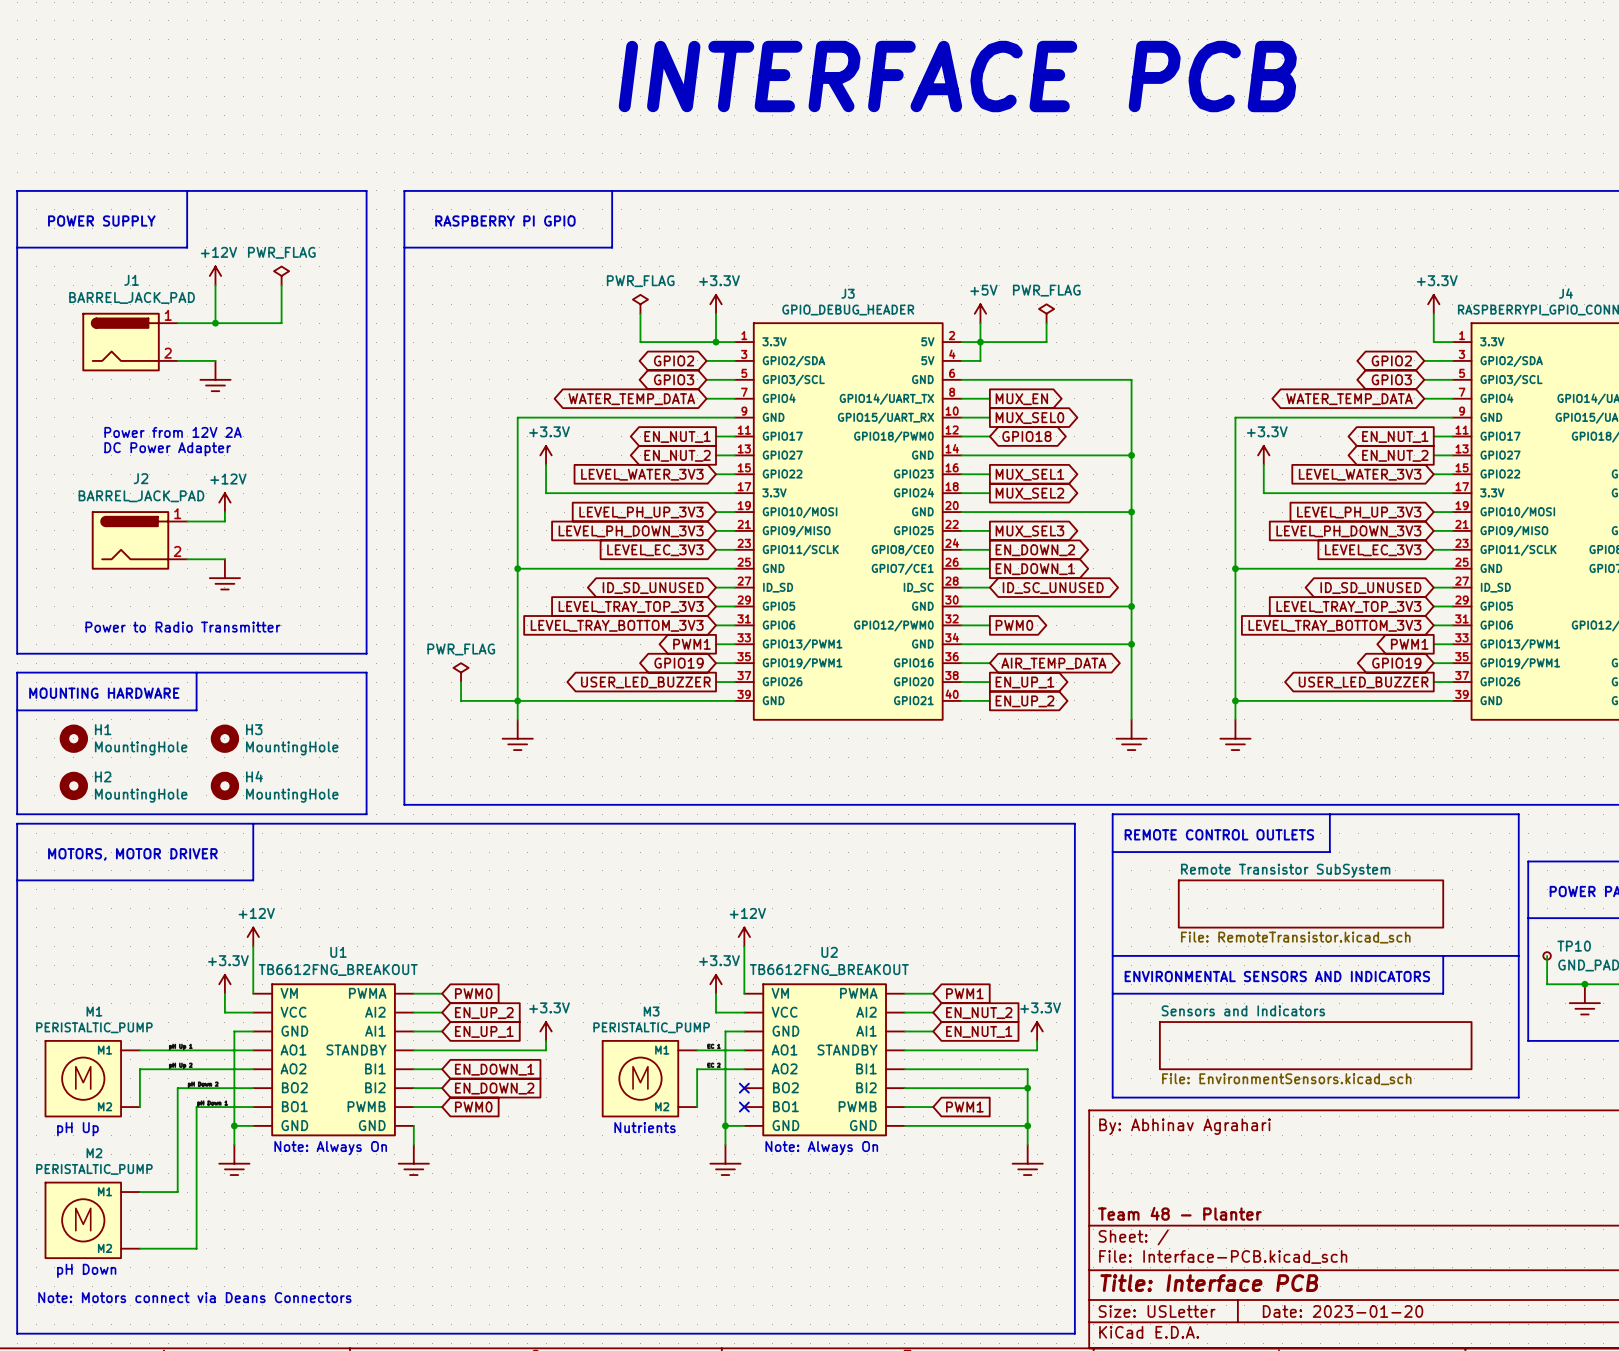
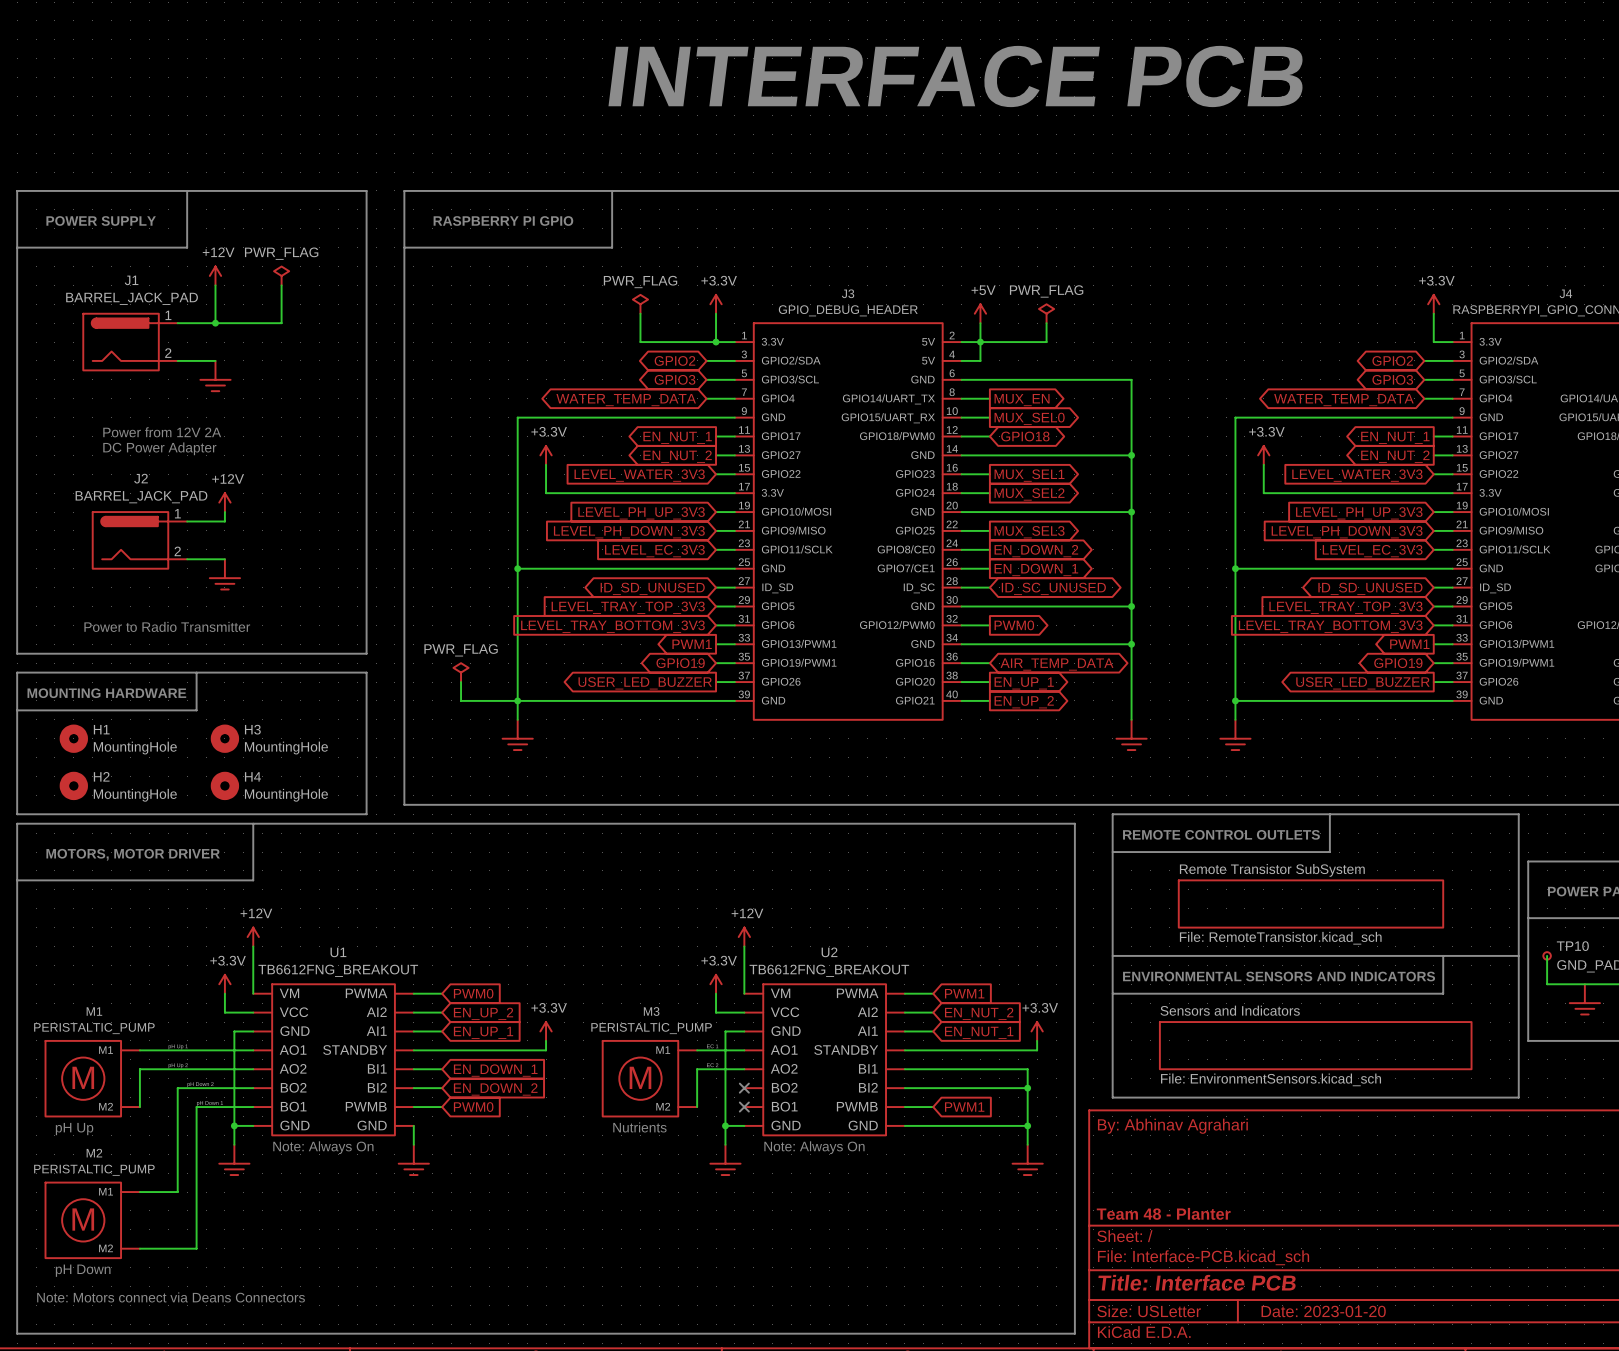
junction: (1584, 984) -> none

